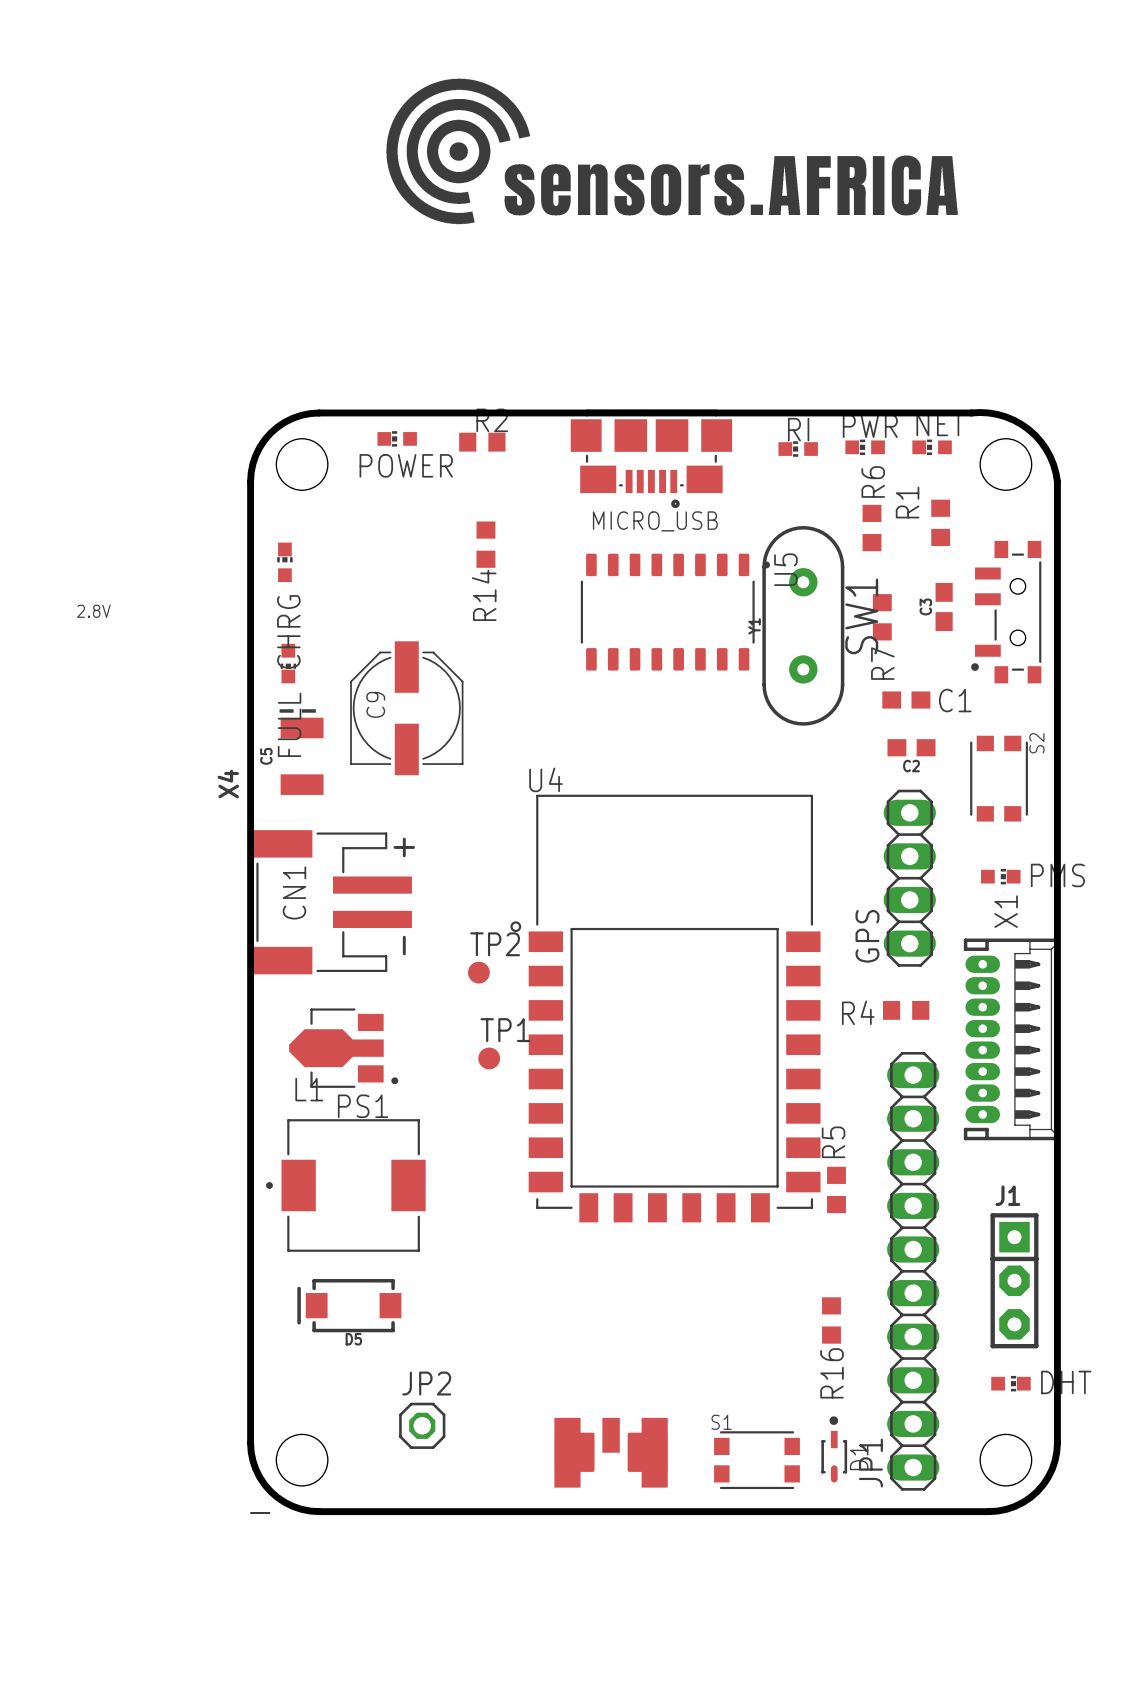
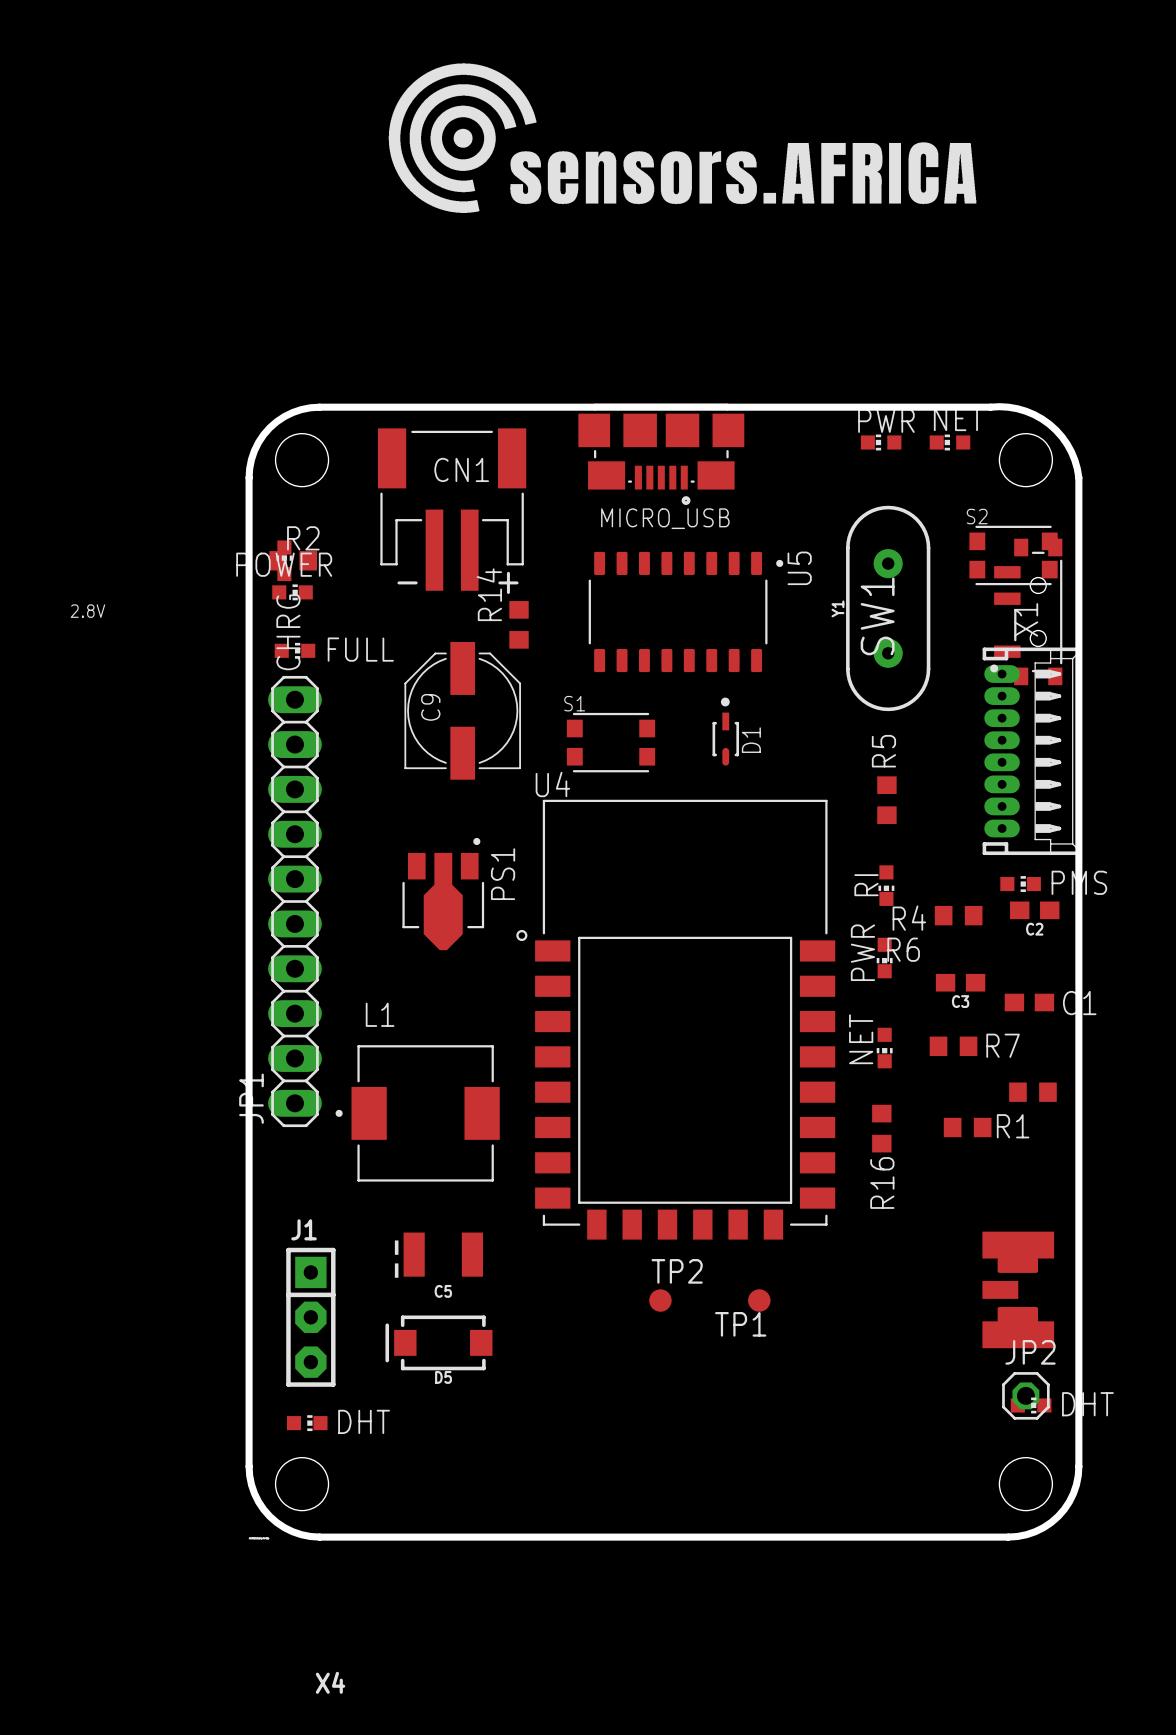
POWER rotation: 0° (397, 438) -> 180° (292, 592)
POWER position: (397, 438) -> (292, 592)
R2 position: (482, 442) -> (293, 560)
RI: (798, 449) -> none
R6 name position: R6 (873, 482) -> R6 (903, 949)
R1 name position: R1 (907, 502) -> R1 (1013, 1126)
R1 rotation: 0° (940, 522) -> 90° clockwise (1032, 1092)
R1 position: (940, 522) -> (1032, 1092)
R6 rotation: 0° (872, 528) -> 90° clockwise (967, 1127)
R6 position: (872, 528) -> (967, 1127)
R14 position: (485, 544) -> (519, 624)
C3 rotation: 0° (944, 606) -> 90° clockwise (960, 982)
C3 position: (944, 606) -> (960, 982)
R7 rotation: 0° (882, 617) -> 90° clockwise (953, 1046)
R7 position: (882, 617) -> (953, 1046)
Y1 position: (803, 625) -> (888, 608)
FULL rotation: 0° (288, 663) -> 90° counterclockwise (294, 650)
R7 name position: R7 (882, 663) -> R7 (1003, 1045)
C1 position: (906, 700) -> (1029, 1002)
C9 position: (406, 708) -> (462, 710)
S2 name position: S2 (1036, 743) -> S2 (977, 516)
C2 position: (911, 747) -> (1034, 910)
C5 rotation: 0° (301, 752) -> 90° counterclockwise (438, 1254)
C5 position: (301, 752) -> (438, 1254)
S2 rotation: 0° (999, 778) -> 90° clockwise (1013, 555)
S2 position: (999, 778) -> (1013, 555)
RI: none -> (886, 885)
GPS: (909, 878) -> none
CN1 rotation: 0° (332, 902) -> 90° clockwise (452, 509)
CN1 position: (332, 902) -> (452, 509)
PWR: none -> (884, 958)
TP2 position: (478, 972) -> (660, 1300)
R4 position: (906, 1010) -> (958, 915)
TP1 name position: TP1 (505, 1030) -> TP1 (740, 1324)
NET: none -> (884, 1048)
X1 position: (1011, 1039) -> (1031, 751)
PS1 rotation: 0° (343, 1048) -> 90° counterclockwise (443, 894)
PS1 position: (343, 1048) -> (443, 894)
TP1 position: (489, 1058) -> (759, 1300)
L1 position: (345, 1185) -> (417, 1113)
R5 position: (836, 1189) -> (886, 800)
JP1 position: (913, 1271) -> (294, 901)
J1 position: (1014, 1280) -> (310, 1317)
D5 position: (349, 1305) -> (438, 1342)
R16 position: (831, 1320) -> (881, 1128)
DHT: none -> (307, 1423)
JP2 position: (422, 1425) -> (1025, 1395)
D1 position: (834, 1449) -> (725, 731)
X4 rotation: 0° (611, 1452) -> 90° counterclockwise (1018, 1289)
X4 position: (611, 1452) -> (1018, 1289)
S1 position: (757, 1460) -> (611, 742)

